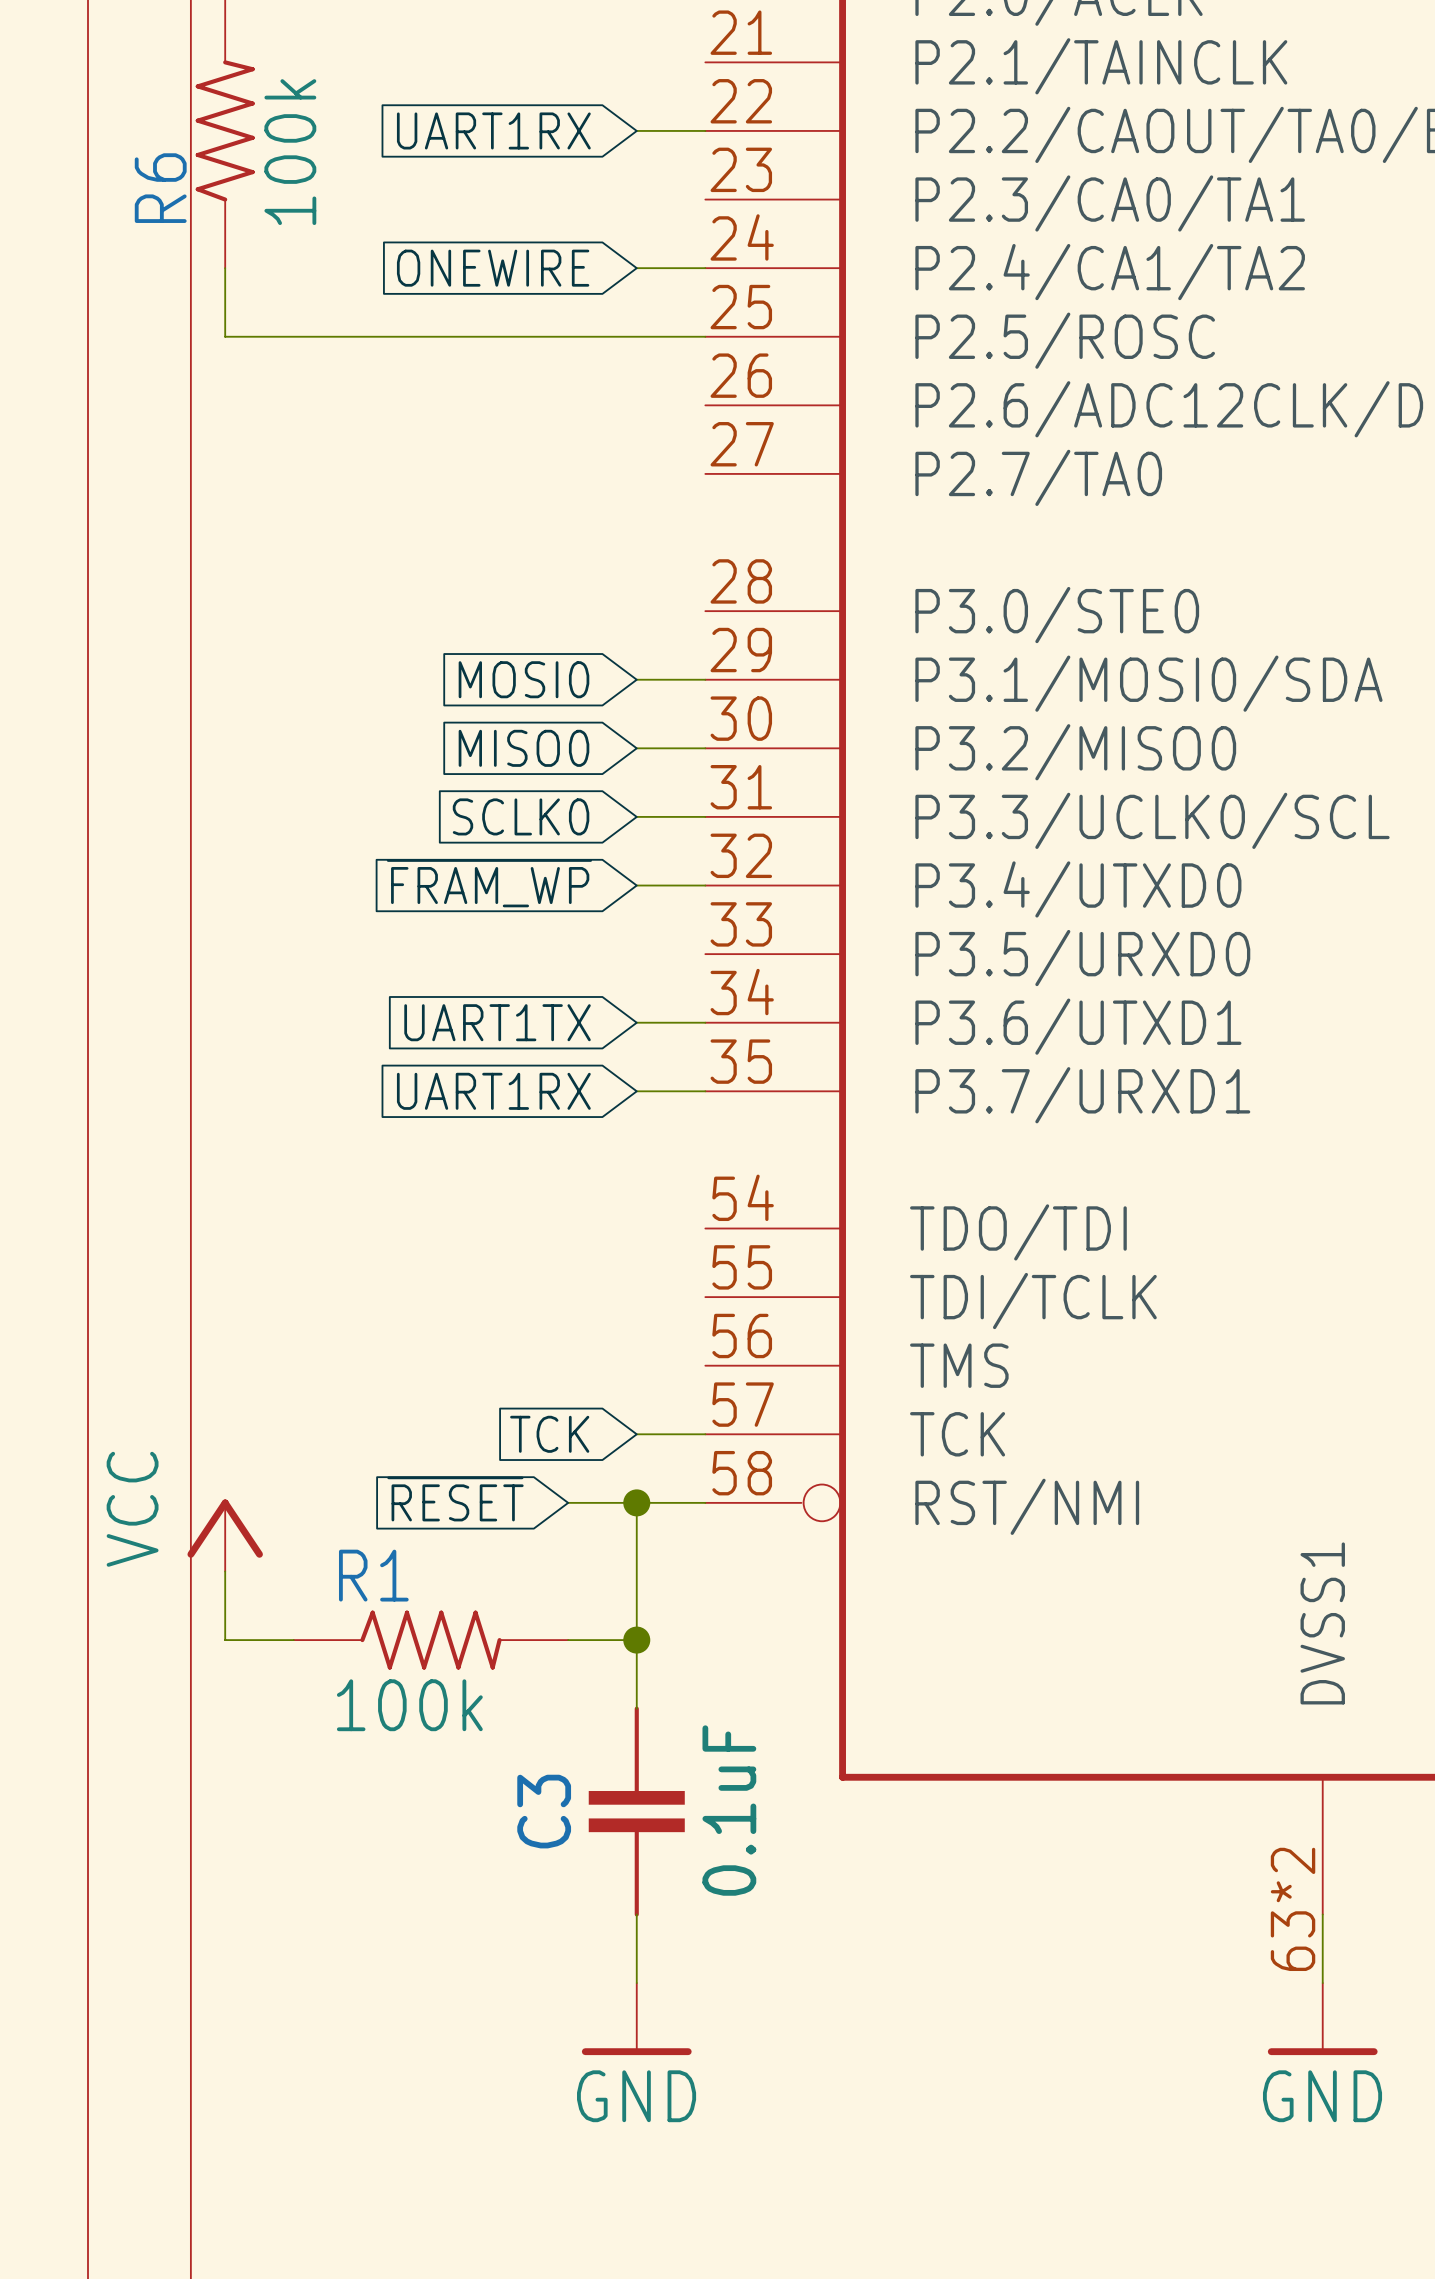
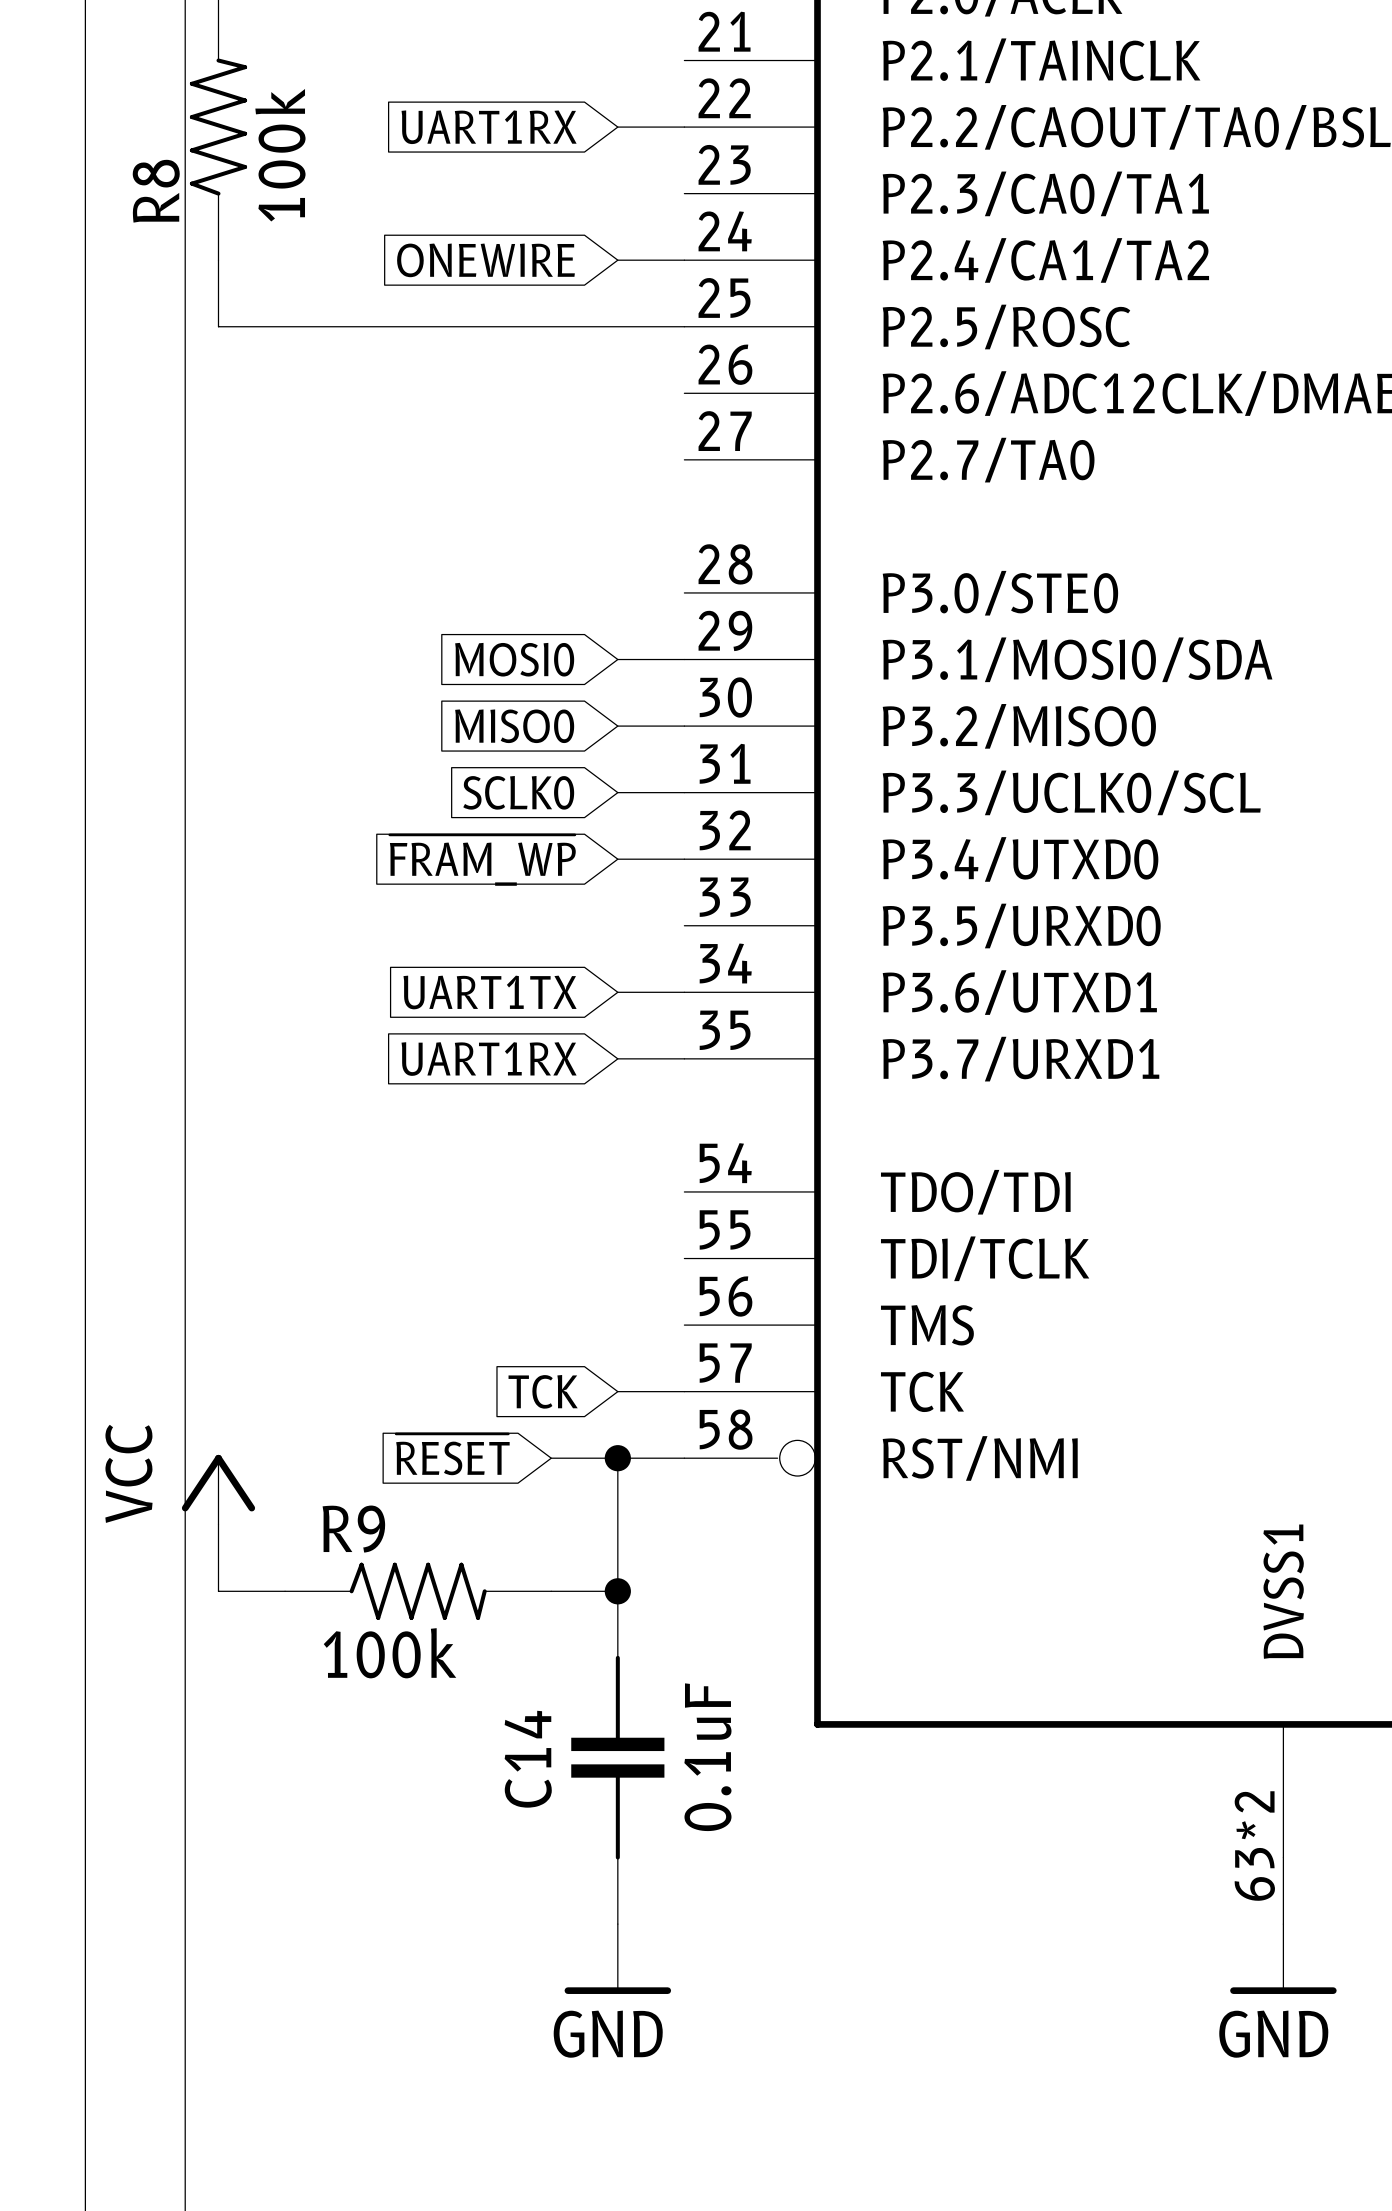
R6 name: R6 (160, 188) -> R8 (156, 191)
R1 name: R1 (373, 1575) -> R9 (353, 1529)
C3 name: C3 (544, 1811) -> C14 (528, 1759)

